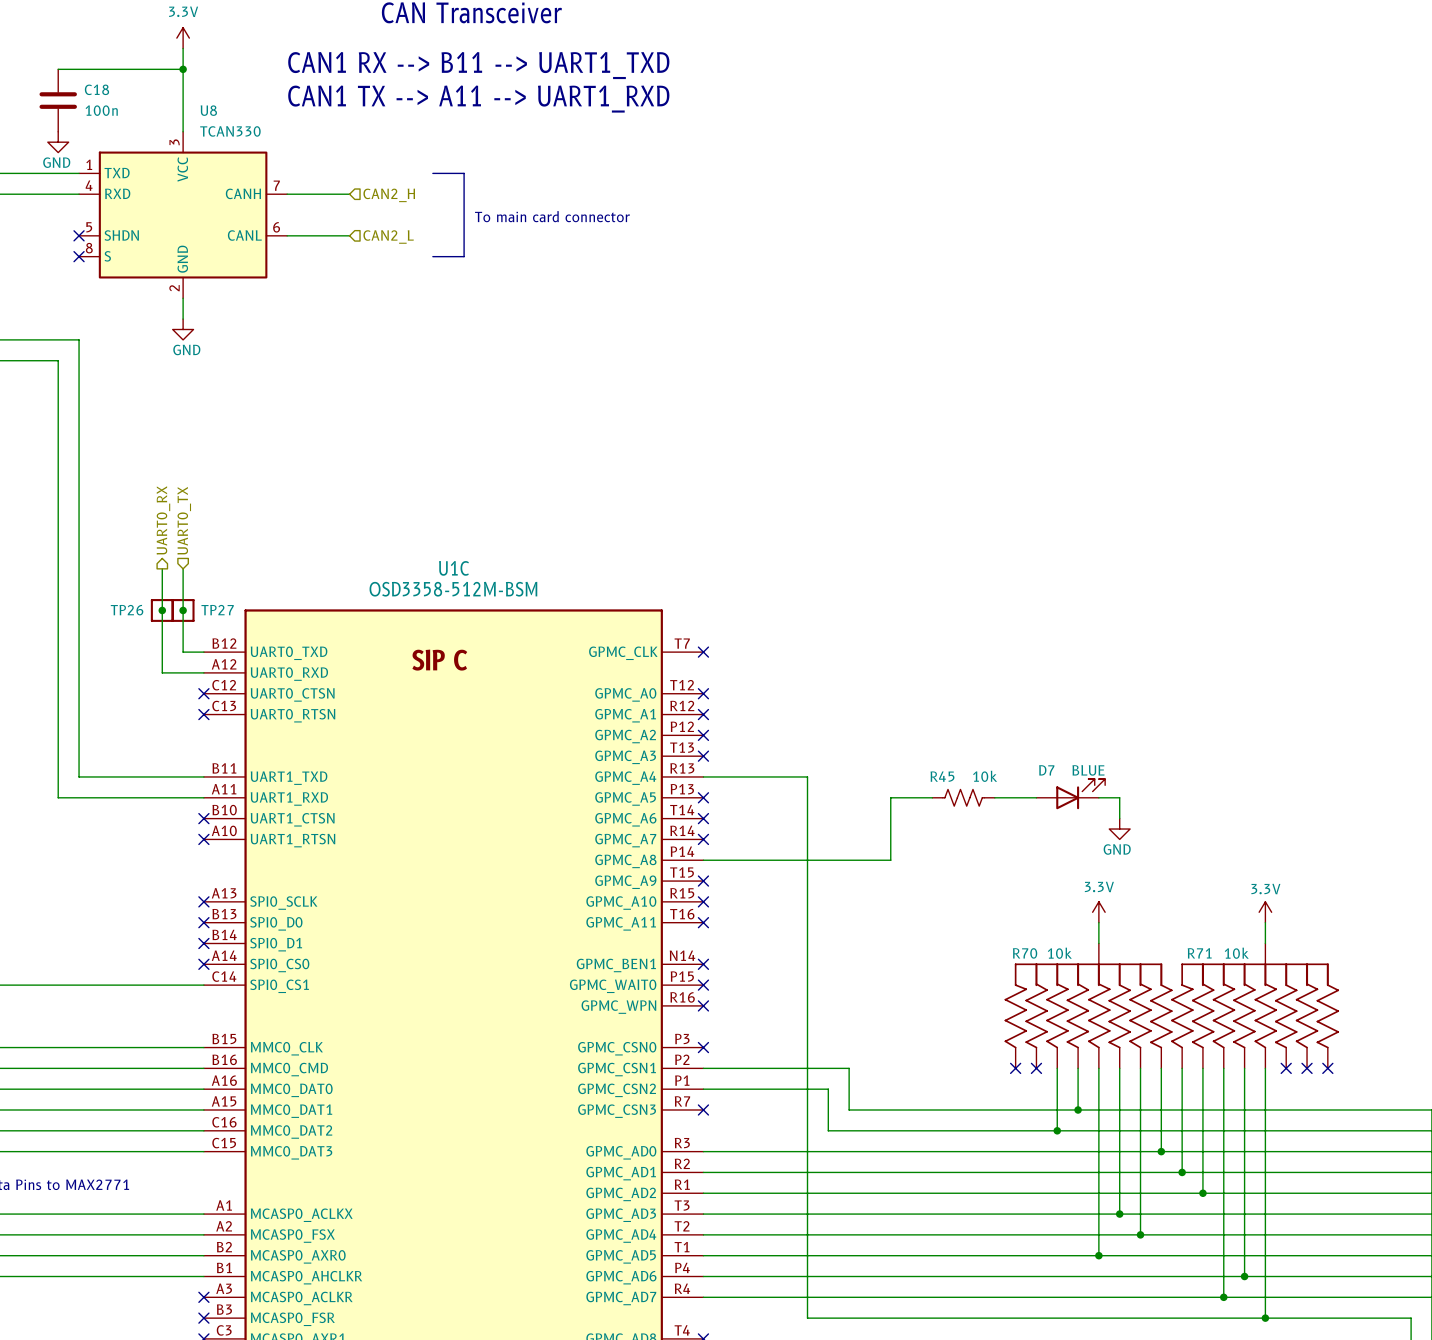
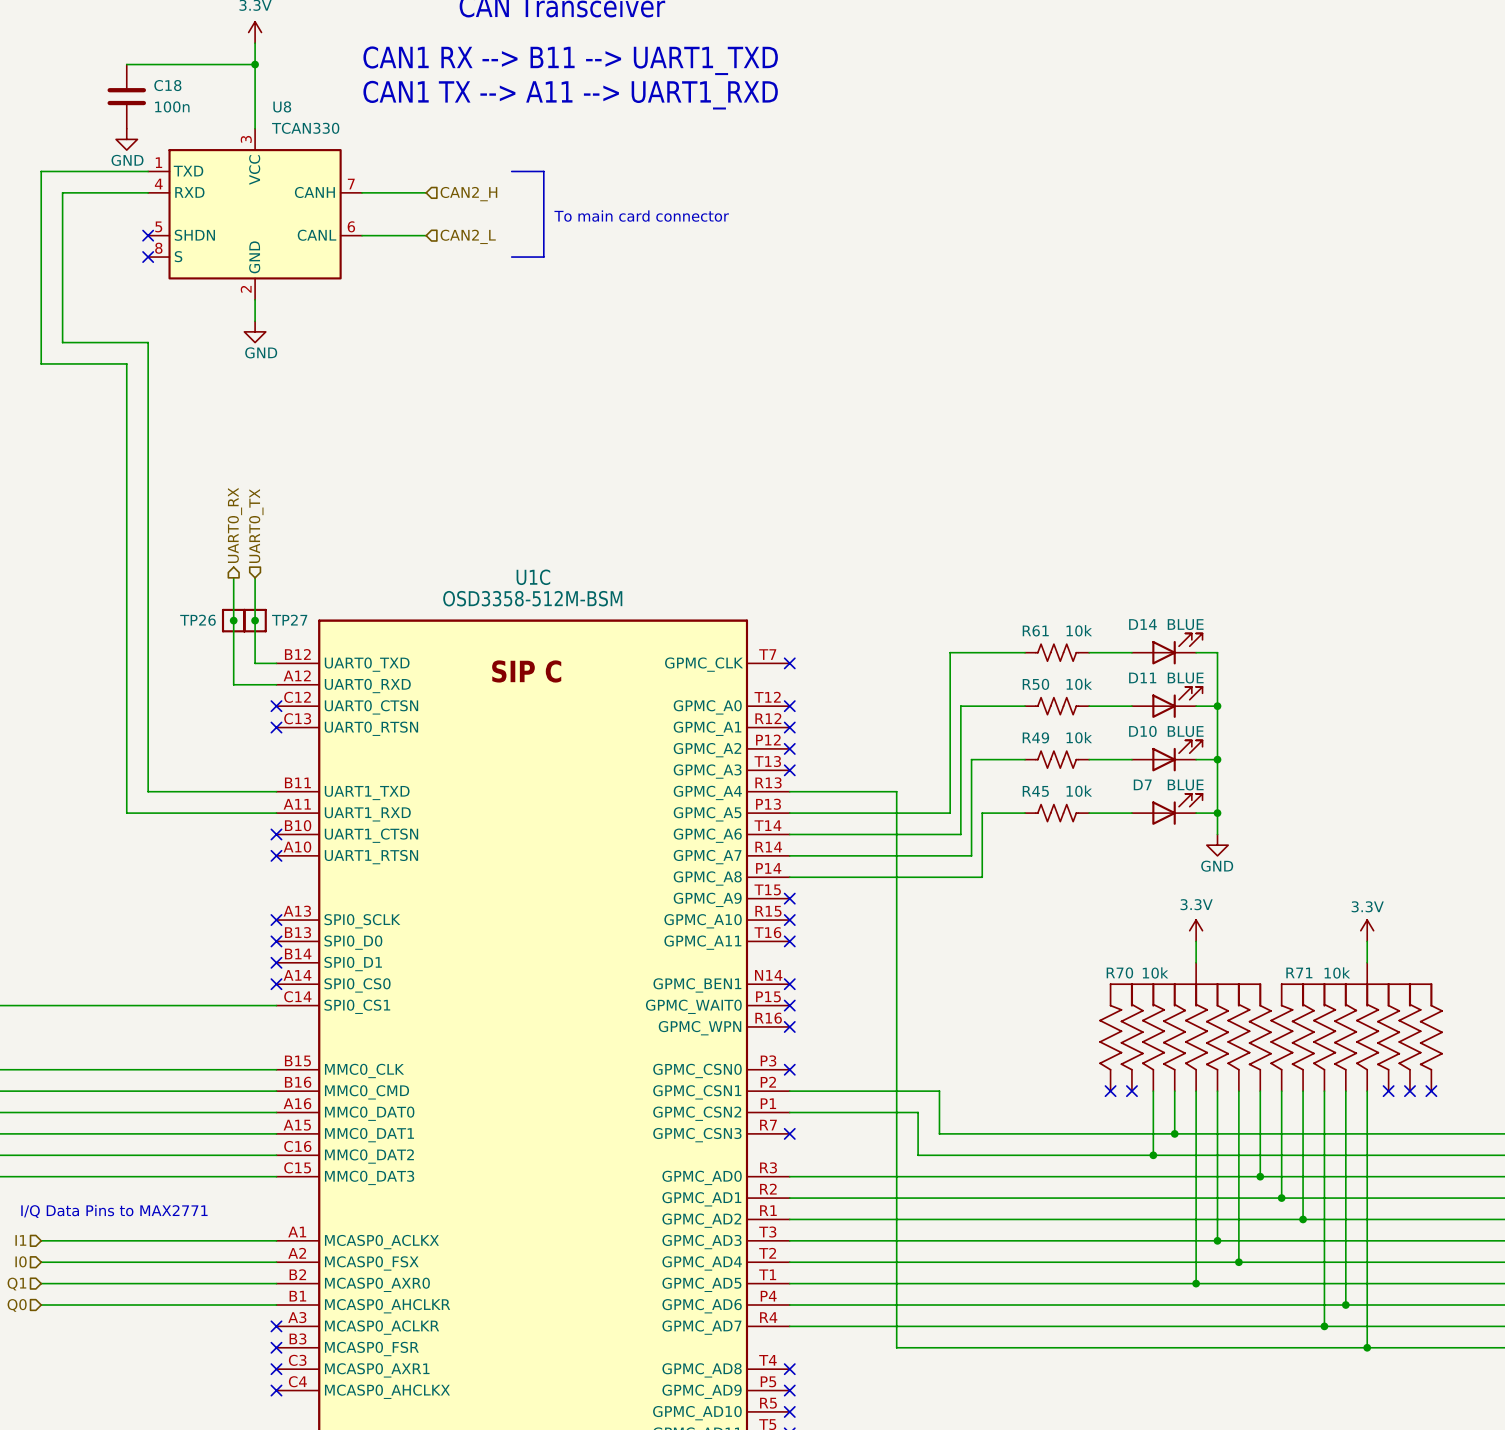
D14: none -> BLUE (1167, 648)
wire: none -> (1025, 652) (950, 652) (950, 813) (789, 813)
R61: none -> 10k (1057, 652)
wire: none -> (1089, 652) (1131, 652)
wire: none -> (1196, 652) (1217, 652) (1217, 813)
D11: none -> BLUE (1167, 702)
wire: none -> (1025, 706) (960, 706) (960, 834) (789, 834)
R50: none -> 10k (1057, 706)
wire: none -> (1089, 706) (1131, 706)
wire: none -> (1196, 706) (1217, 706)
junction: none -> (1217, 706)
D10: none -> BLUE (1167, 755)
wire: none -> (1025, 759) (971, 759) (971, 855) (789, 855)
R49: none -> 10k (1057, 759)
wire: none -> (1089, 759) (1131, 759)
wire: none -> (1196, 759) (1217, 759)
junction: none -> (1217, 759)
no-connect mark: (703, 797) -> none
junction: none -> (1217, 813)
no-connect mark: (703, 818) -> none
no-connect mark: (703, 839) -> none

